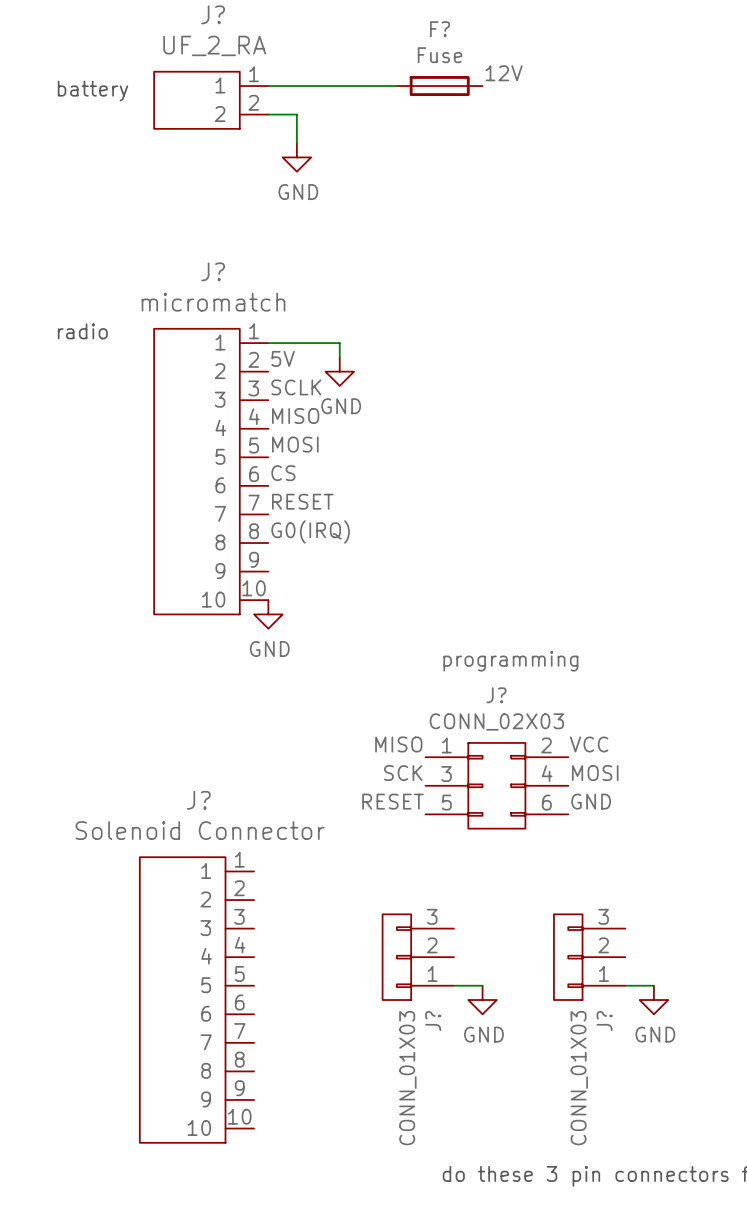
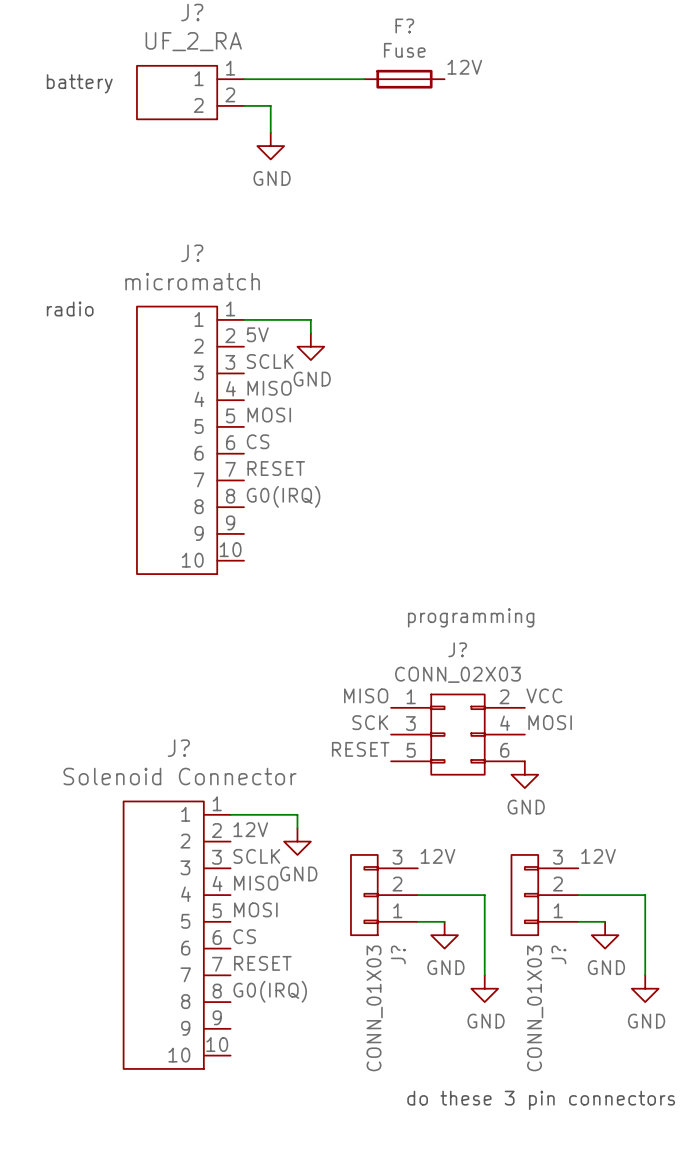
power symbol: GND (268, 614) -> none
label: GND (591, 801) -> none
power symbol: none -> GND (524, 774)
wire: none -> (230, 814) (297, 814) (297, 828)
label: none -> 12V (250, 829)
power symbol: none -> GND (297, 841)
label: none -> SCLK (256, 856)
label: none -> 12V (438, 856)
label: none -> 12V (598, 856)
label: none -> MISO (256, 883)
wire: none -> (417, 895) (484, 895) (484, 975)
wire: none -> (578, 895) (645, 895) (645, 975)
label: none -> MOSI (255, 909)
label: none -> CS (244, 936)
label: none -> RESET (262, 963)
power symbol: none -> GND (484, 988)
power symbol: none -> GND (645, 988)
label: none -> G0(IRQ) (270, 991)

